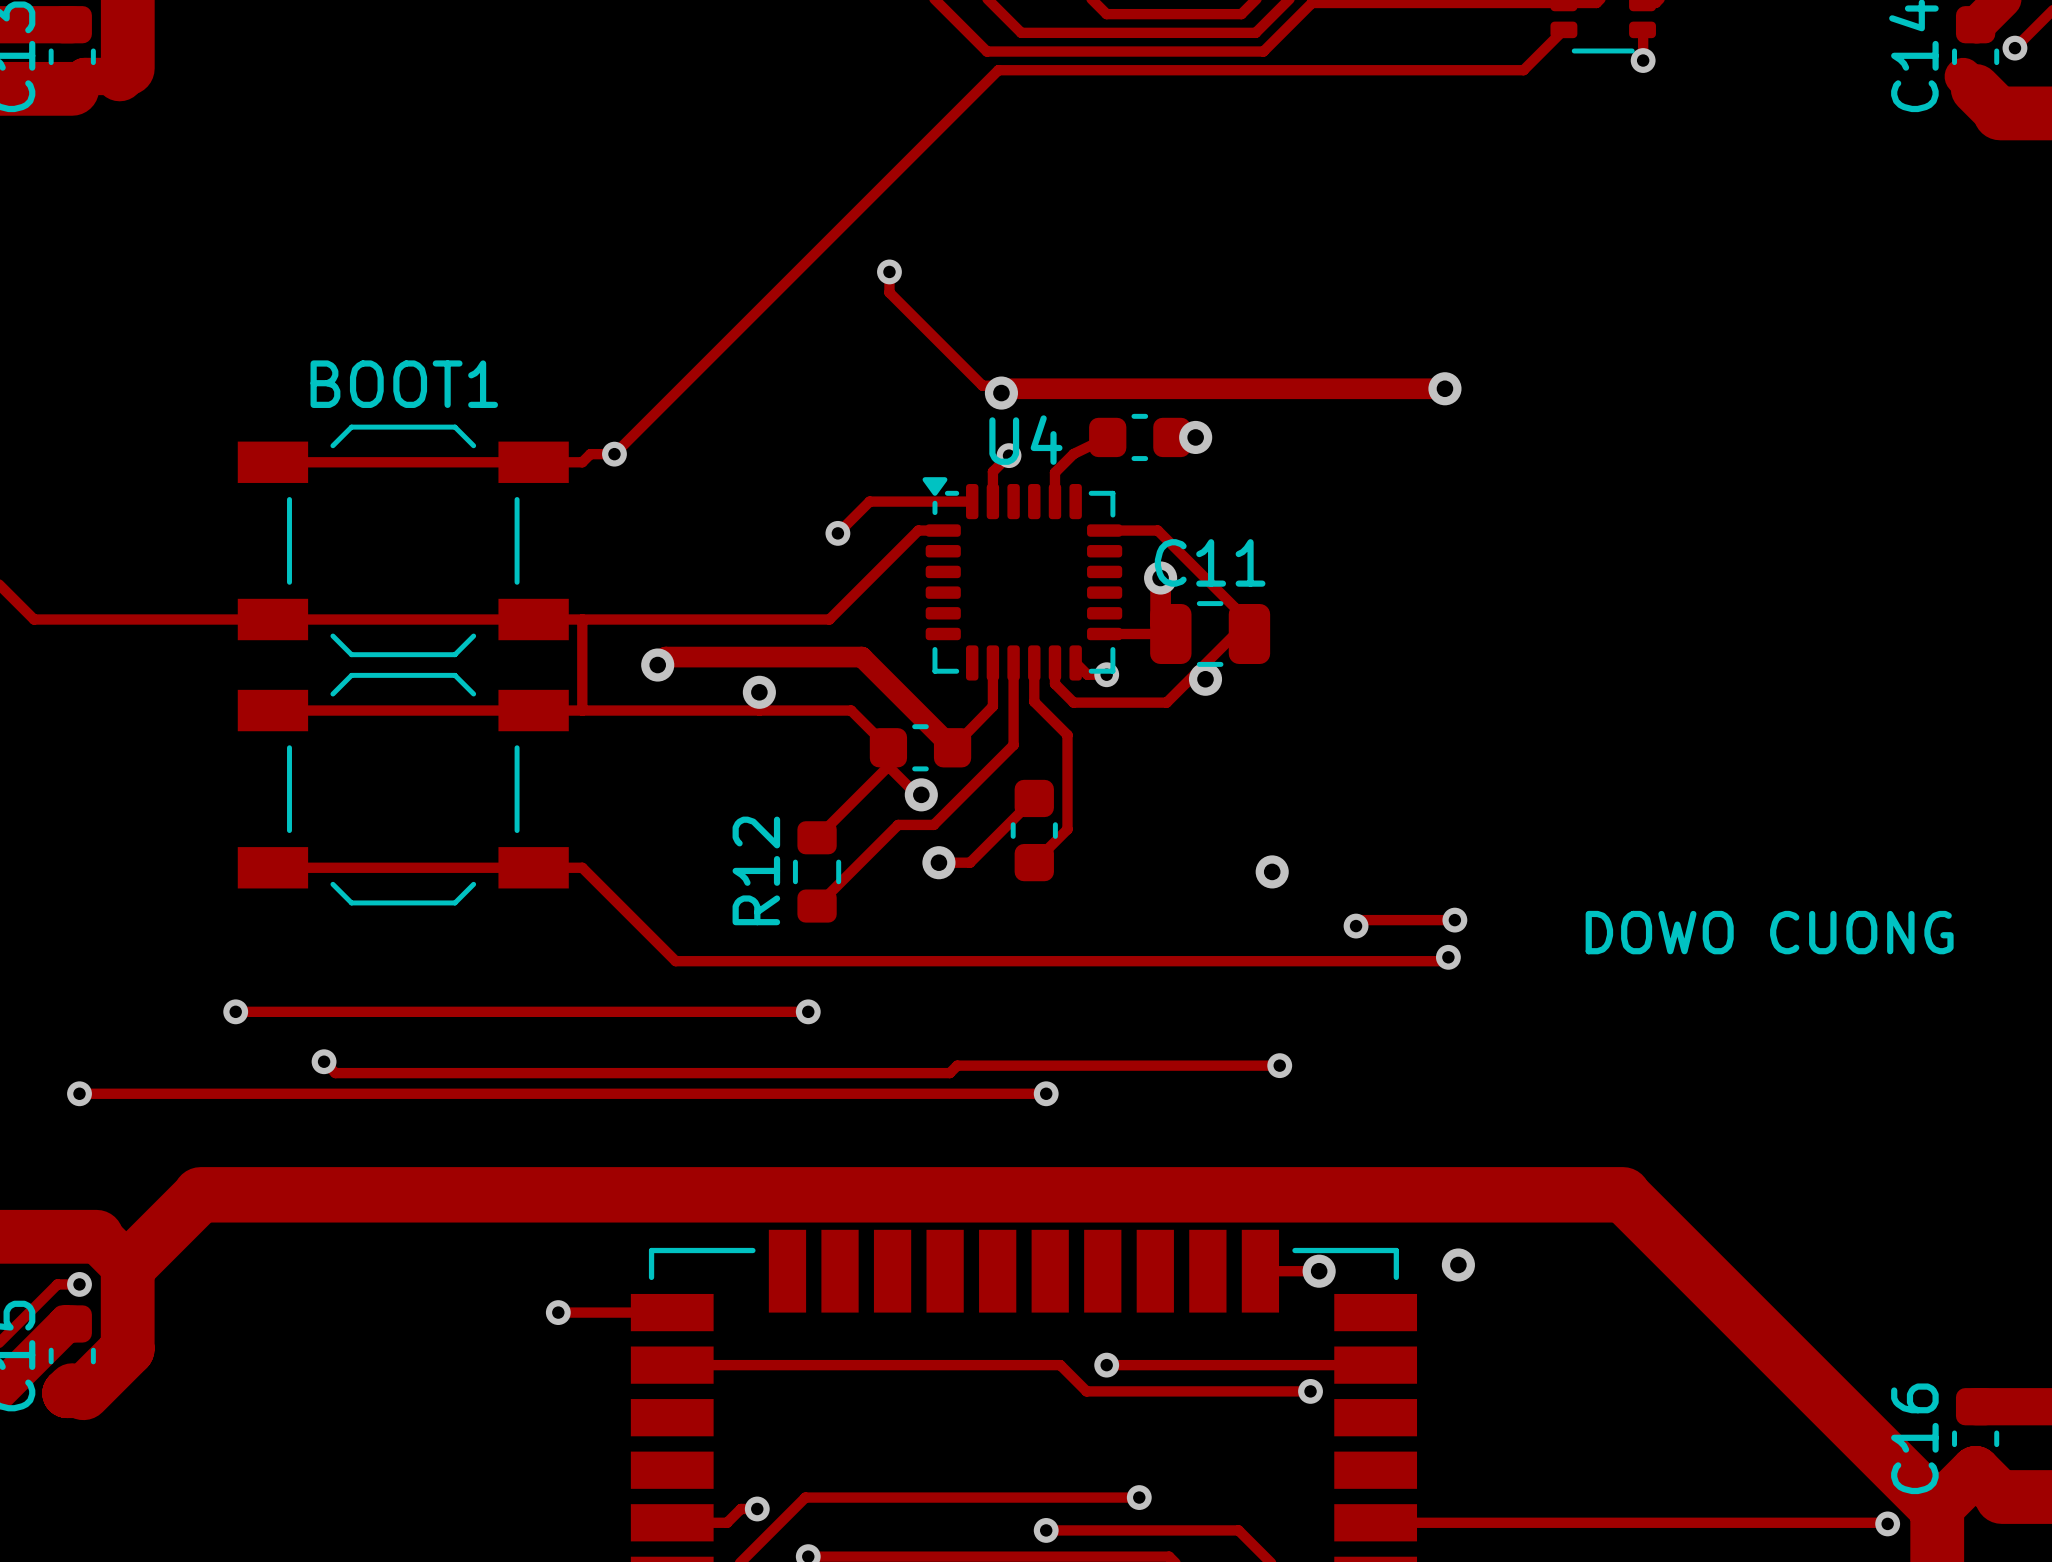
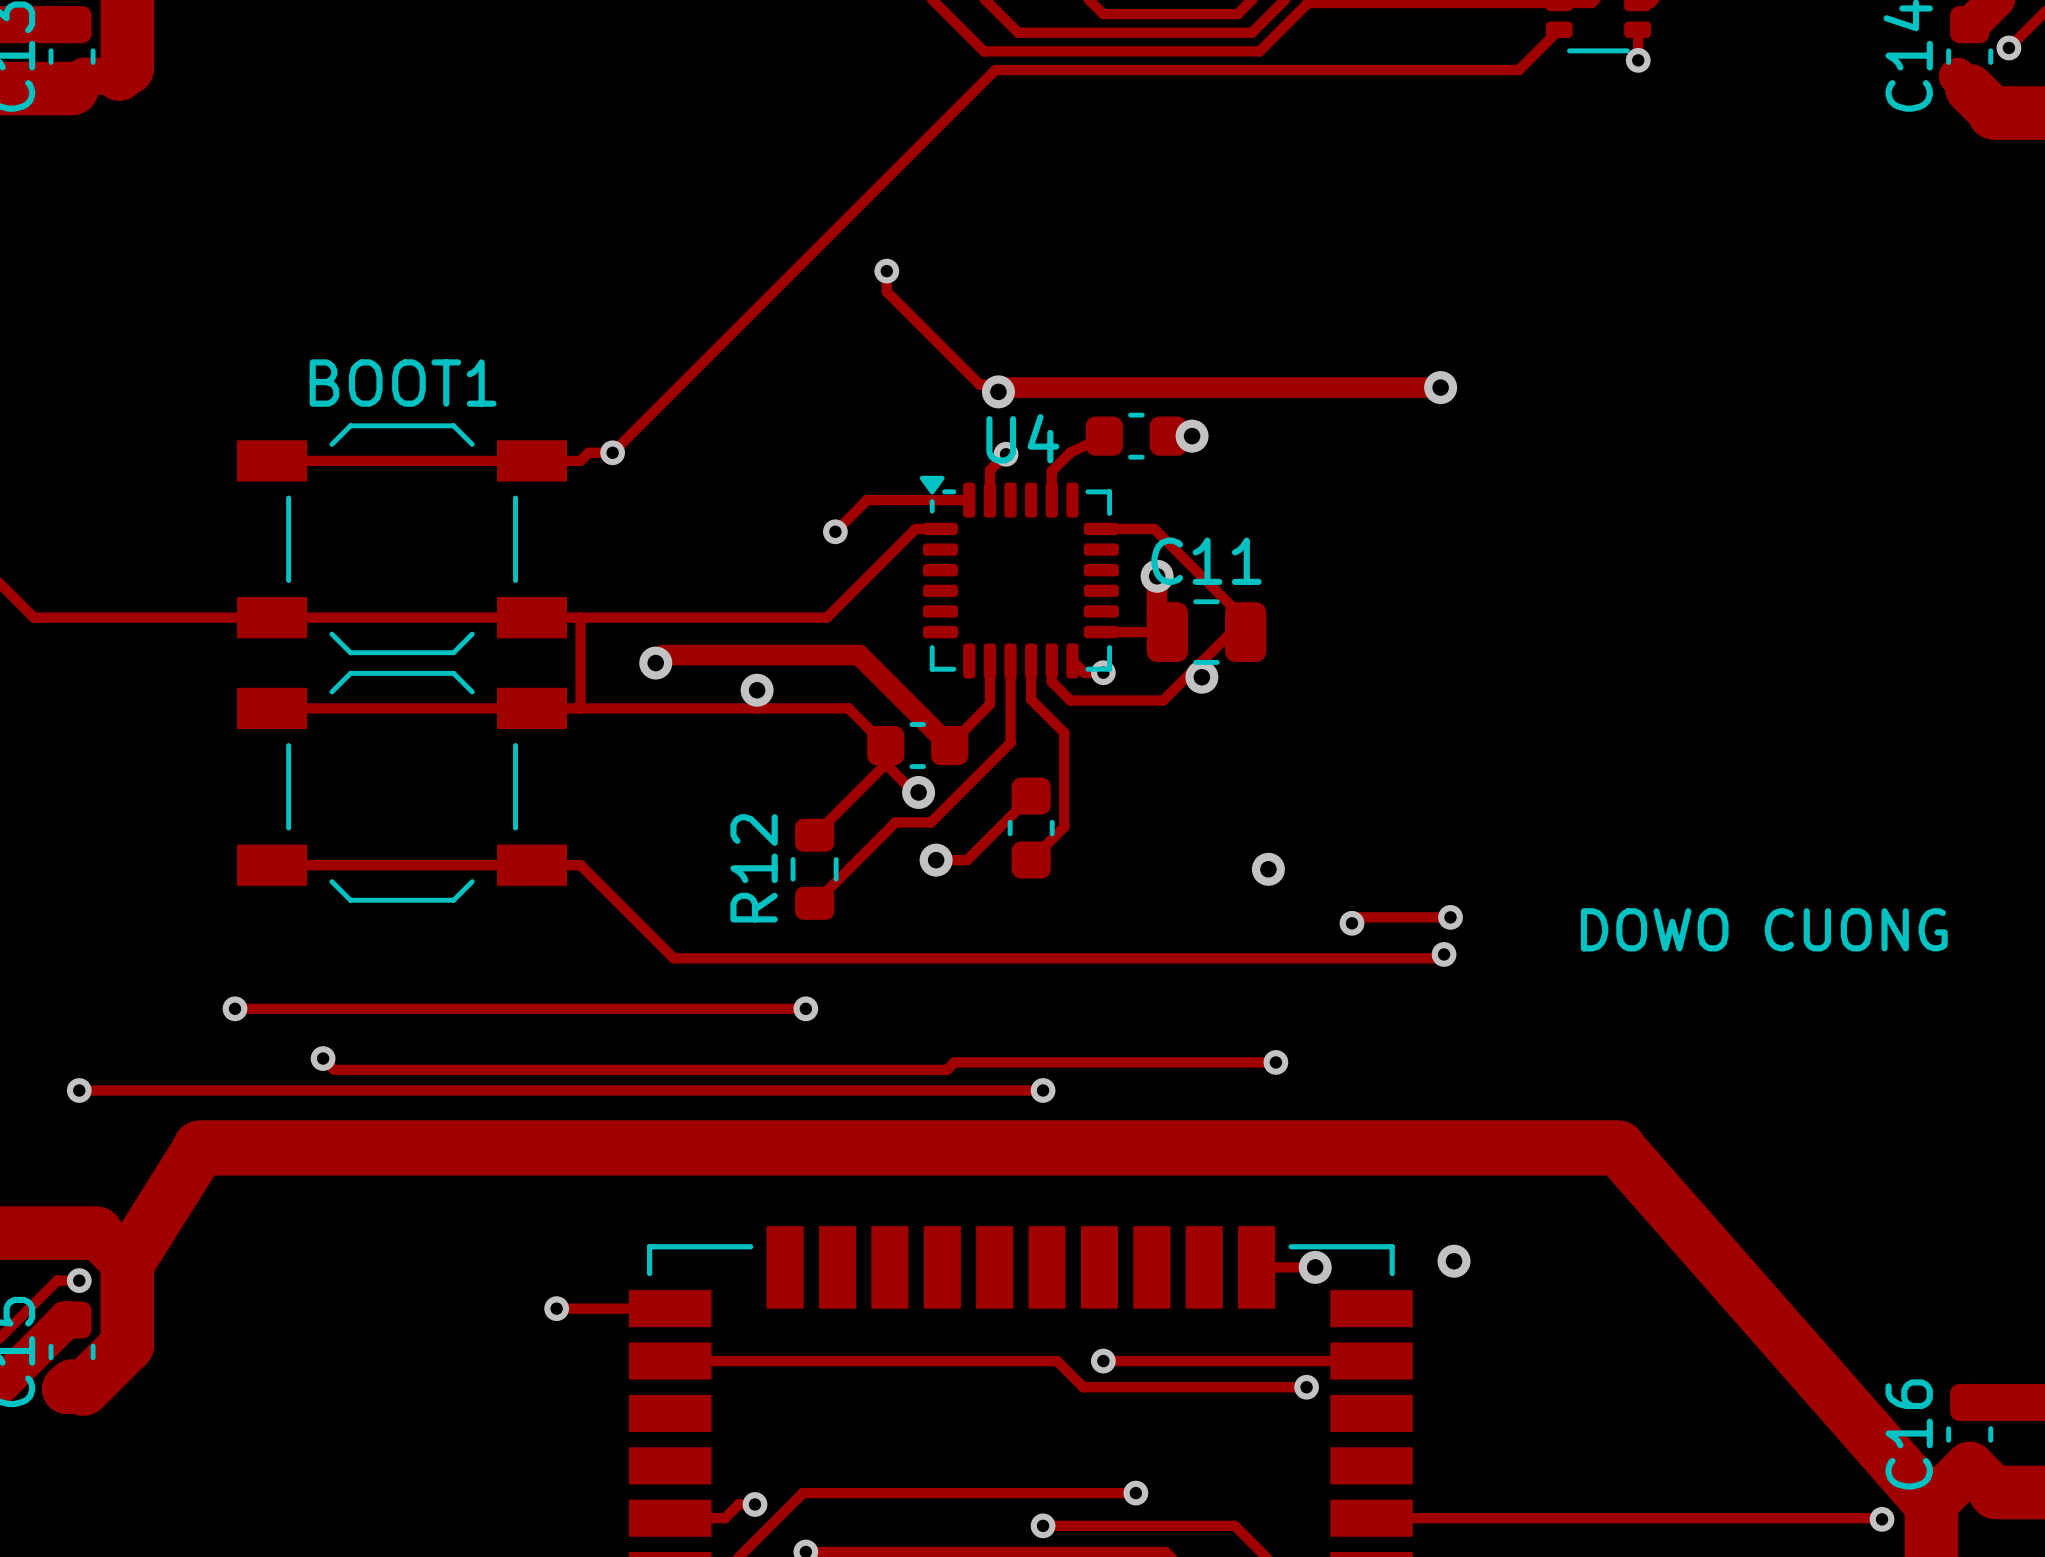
track: (127, 1267) (200, 1194) (1623, 1194) (1937, 1509) -> (127, 1264) (200, 1147) (1618, 1147) (1931, 1504)

